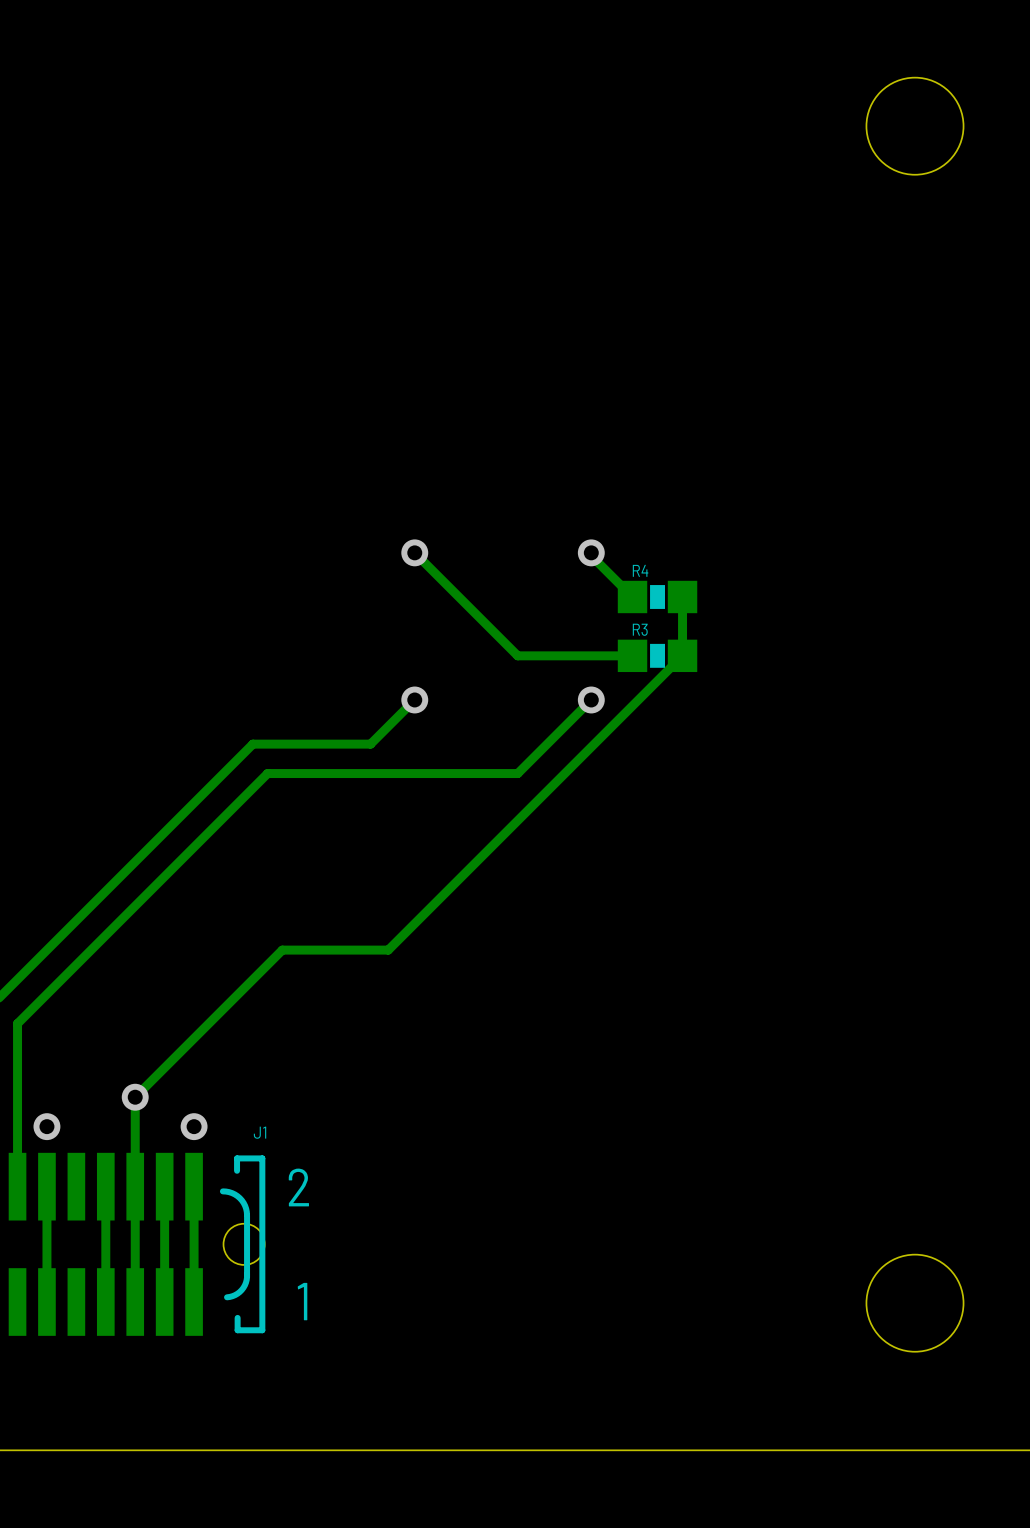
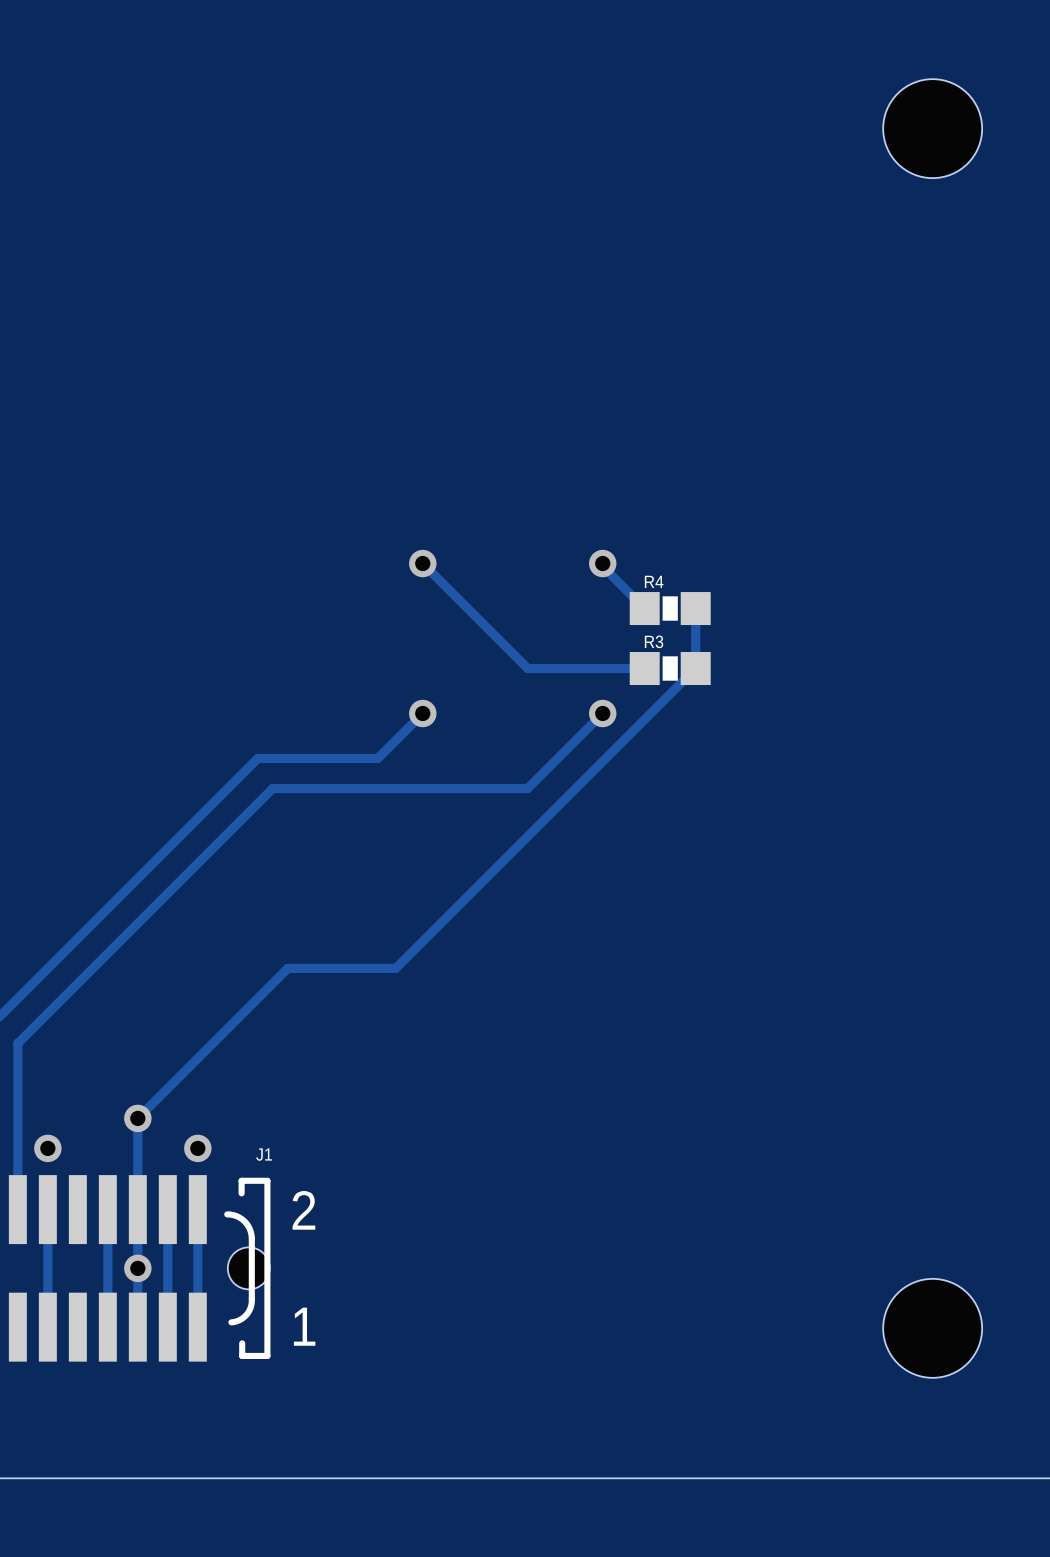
via: none -> (137, 1268)

